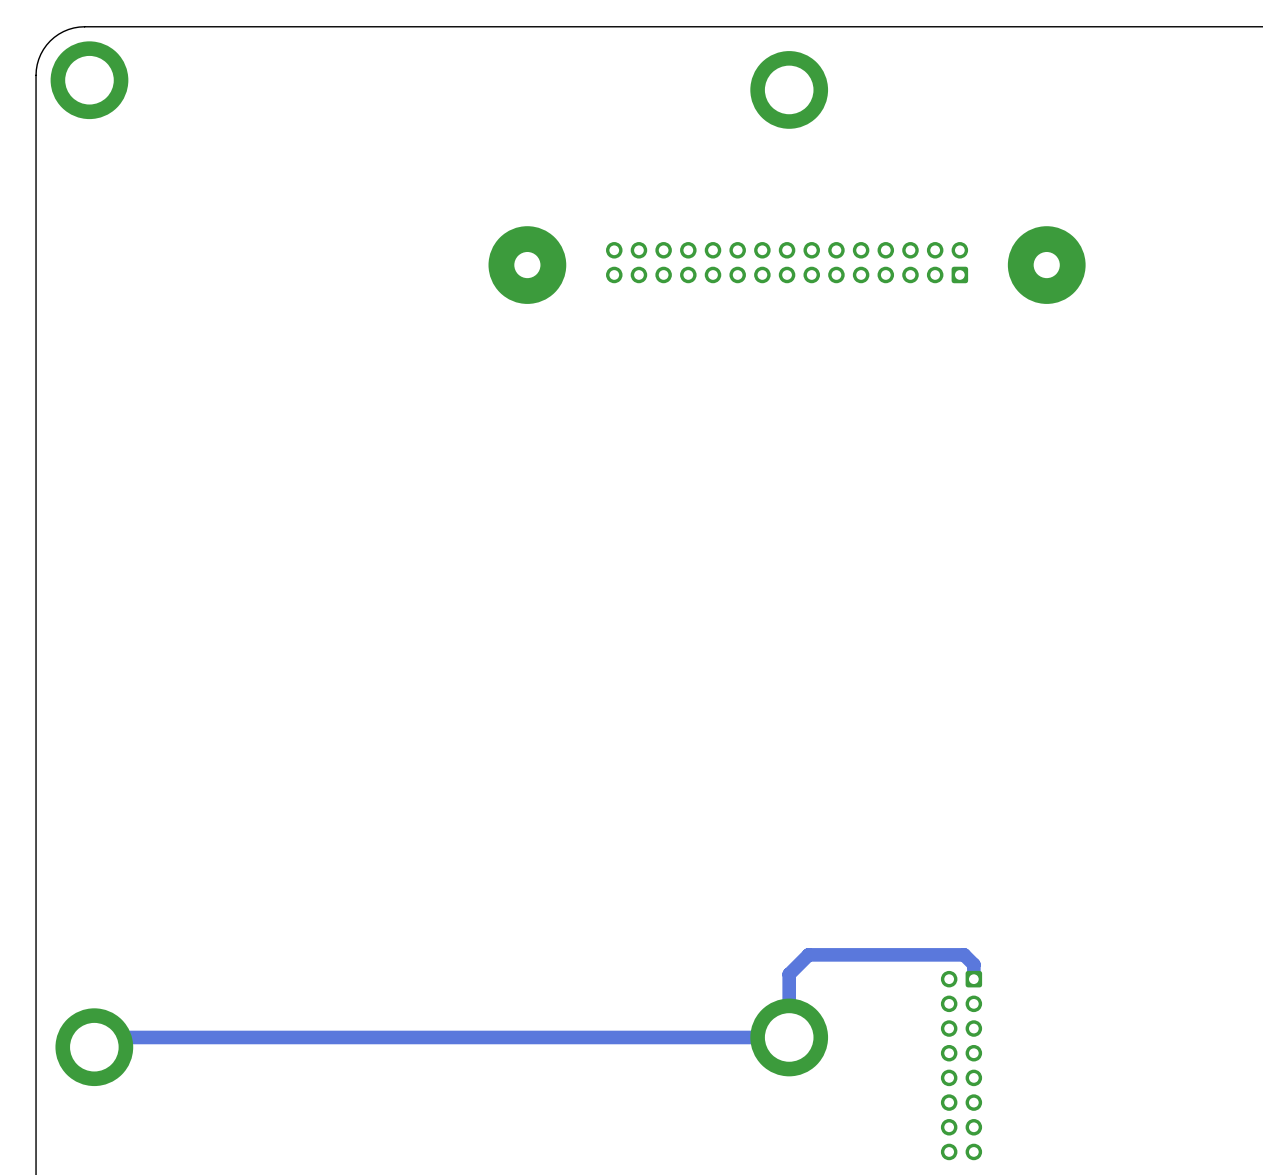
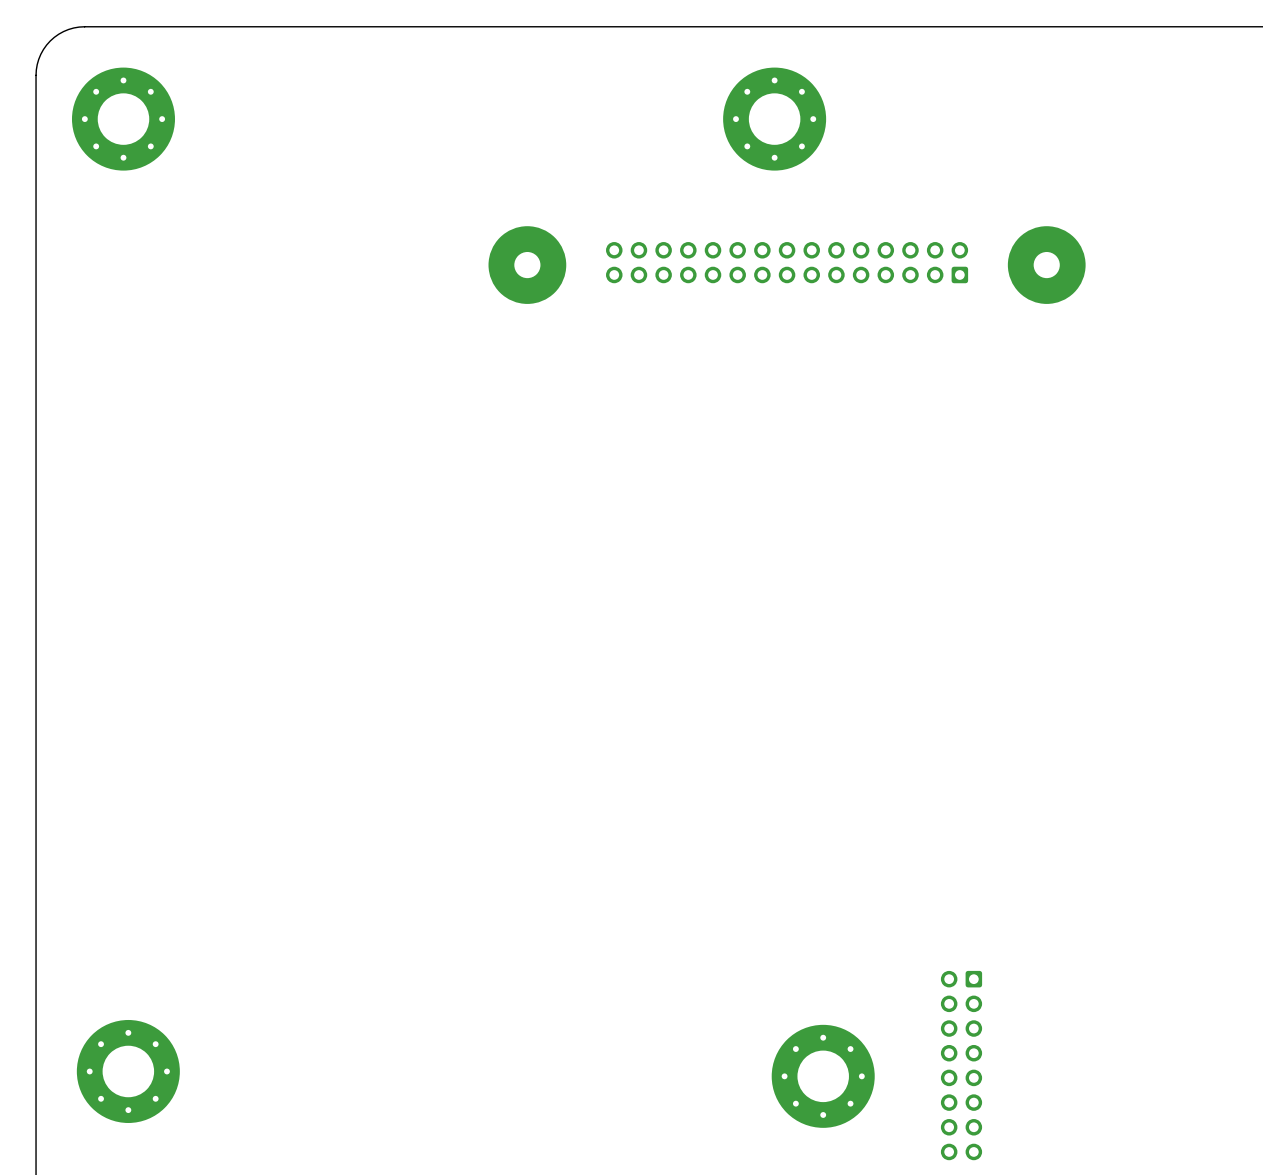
via: (89, 80) -> none
via: (789, 89) -> none
part: none -> (123, 119)
part: none -> (774, 119)
track: (973, 979) (973, 964) (964, 954) (808, 954) (789, 974) (789, 1037) -> none
track: (789, 1037) (104, 1037) -> none
via: (789, 1037) -> none
via: (94, 1047) -> none
part: none -> (128, 1071)
part: none -> (823, 1076)

